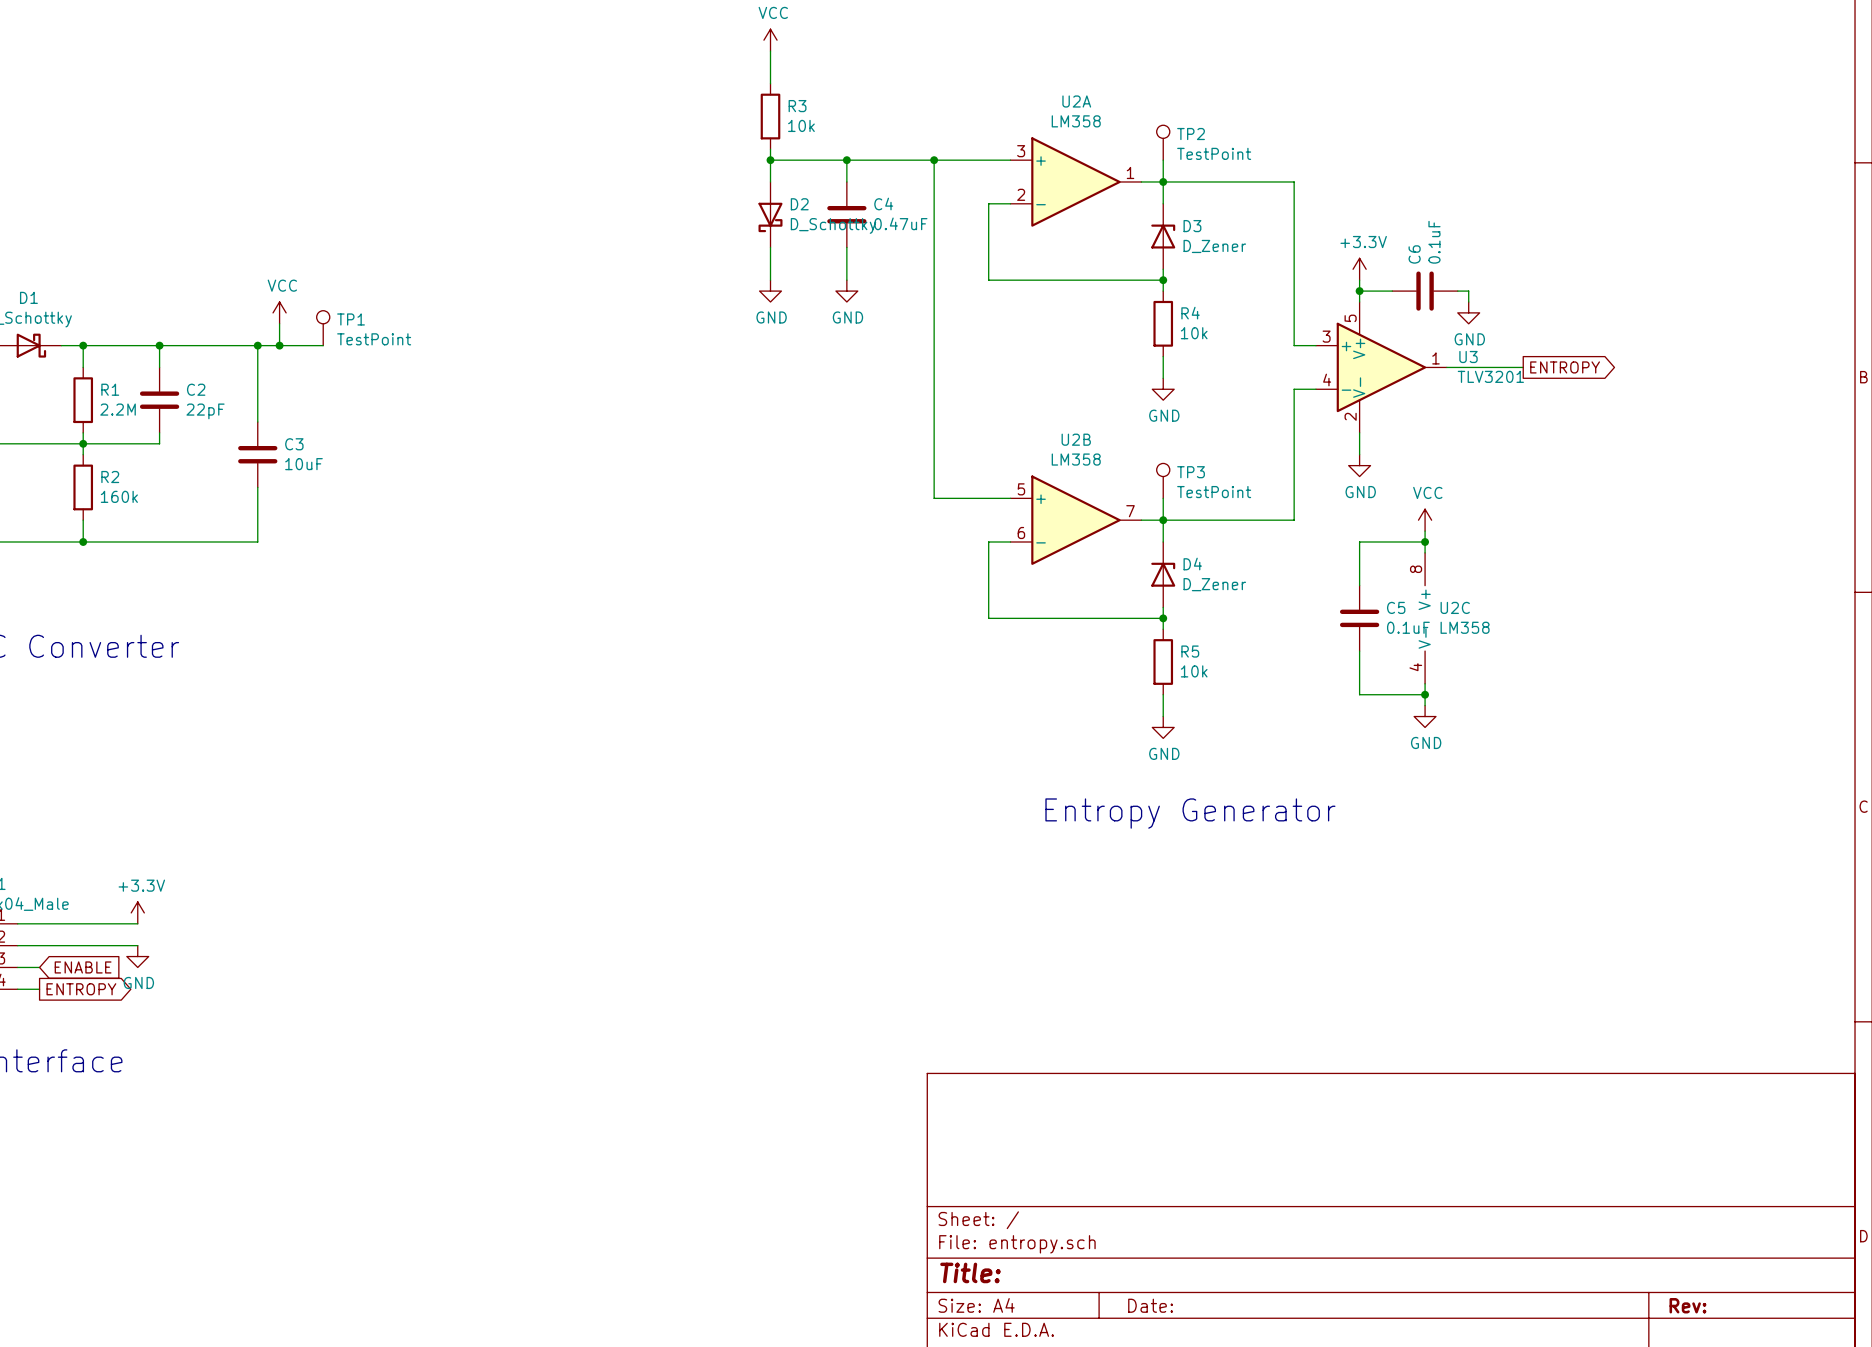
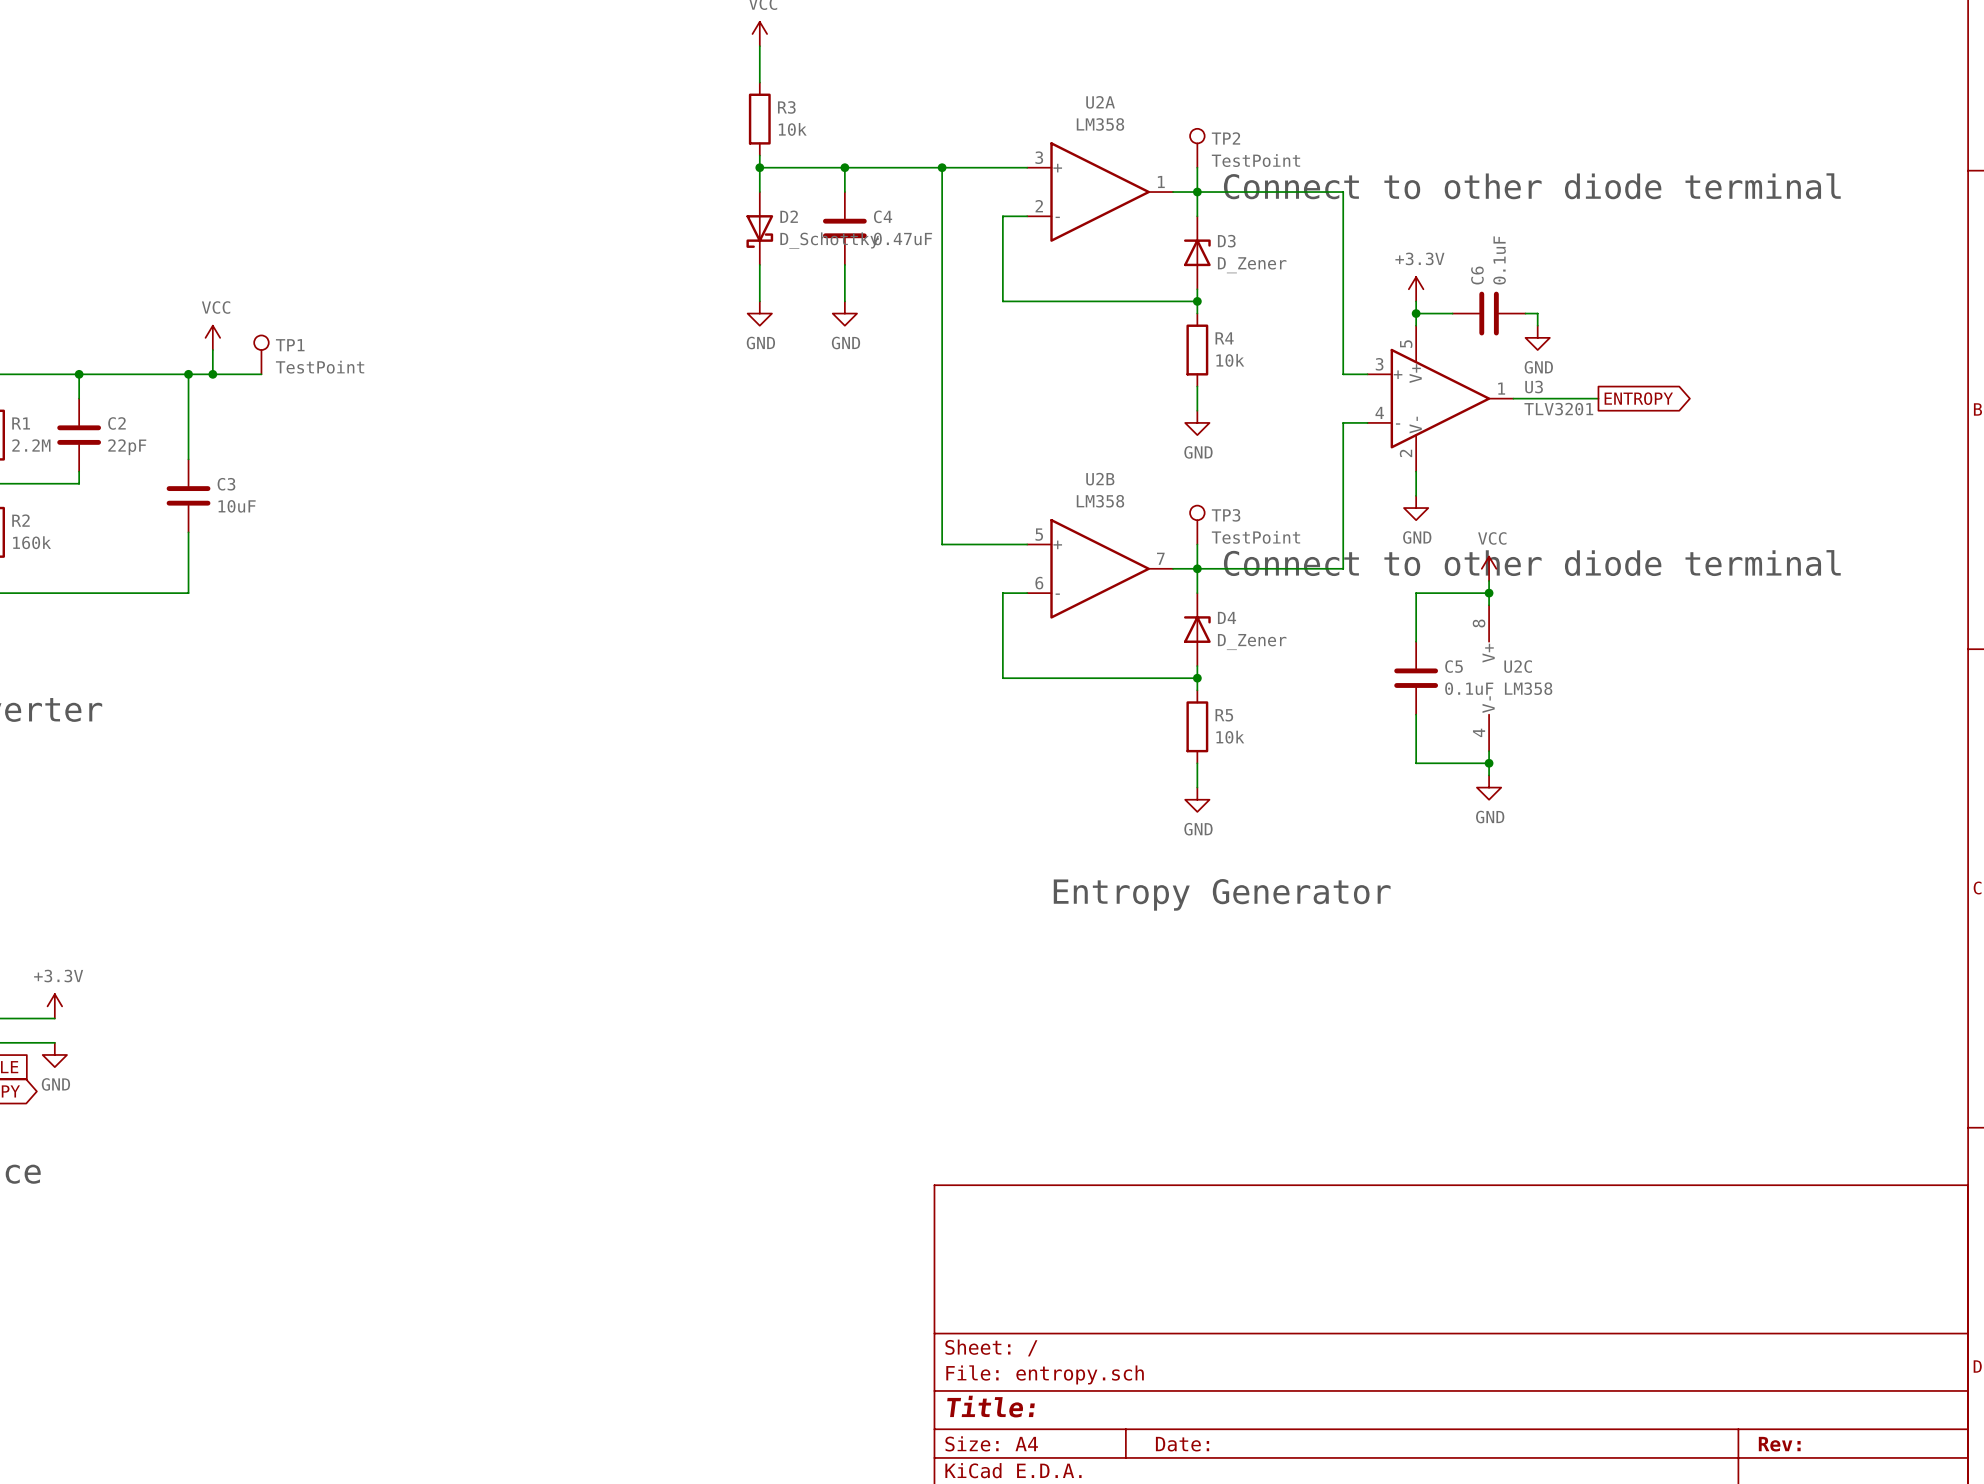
text: none -> Connect to other diode terminal (1532, 186)
text: none -> Connect to other diode terminal (1532, 563)

